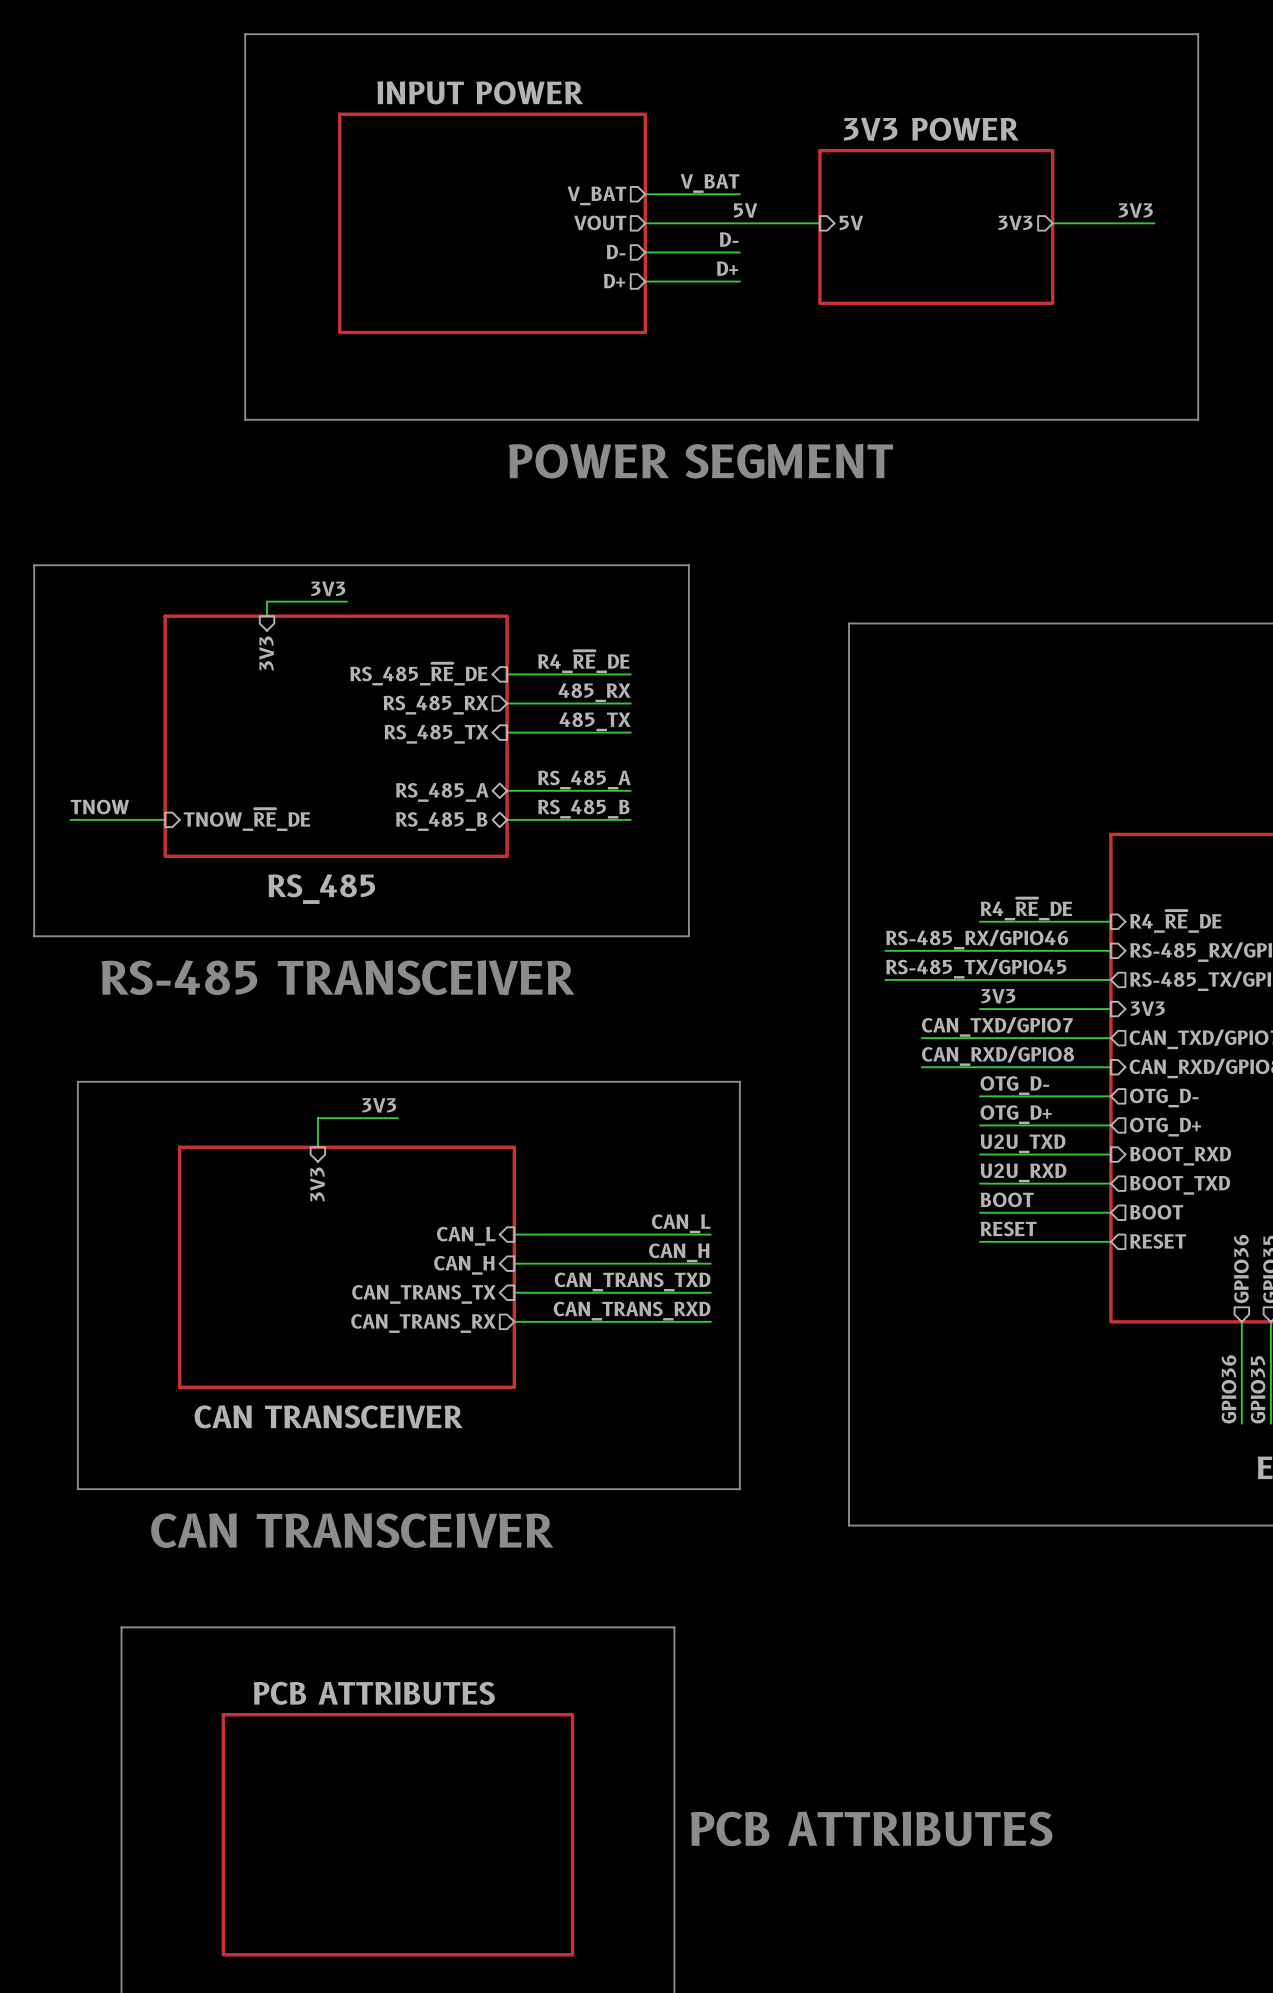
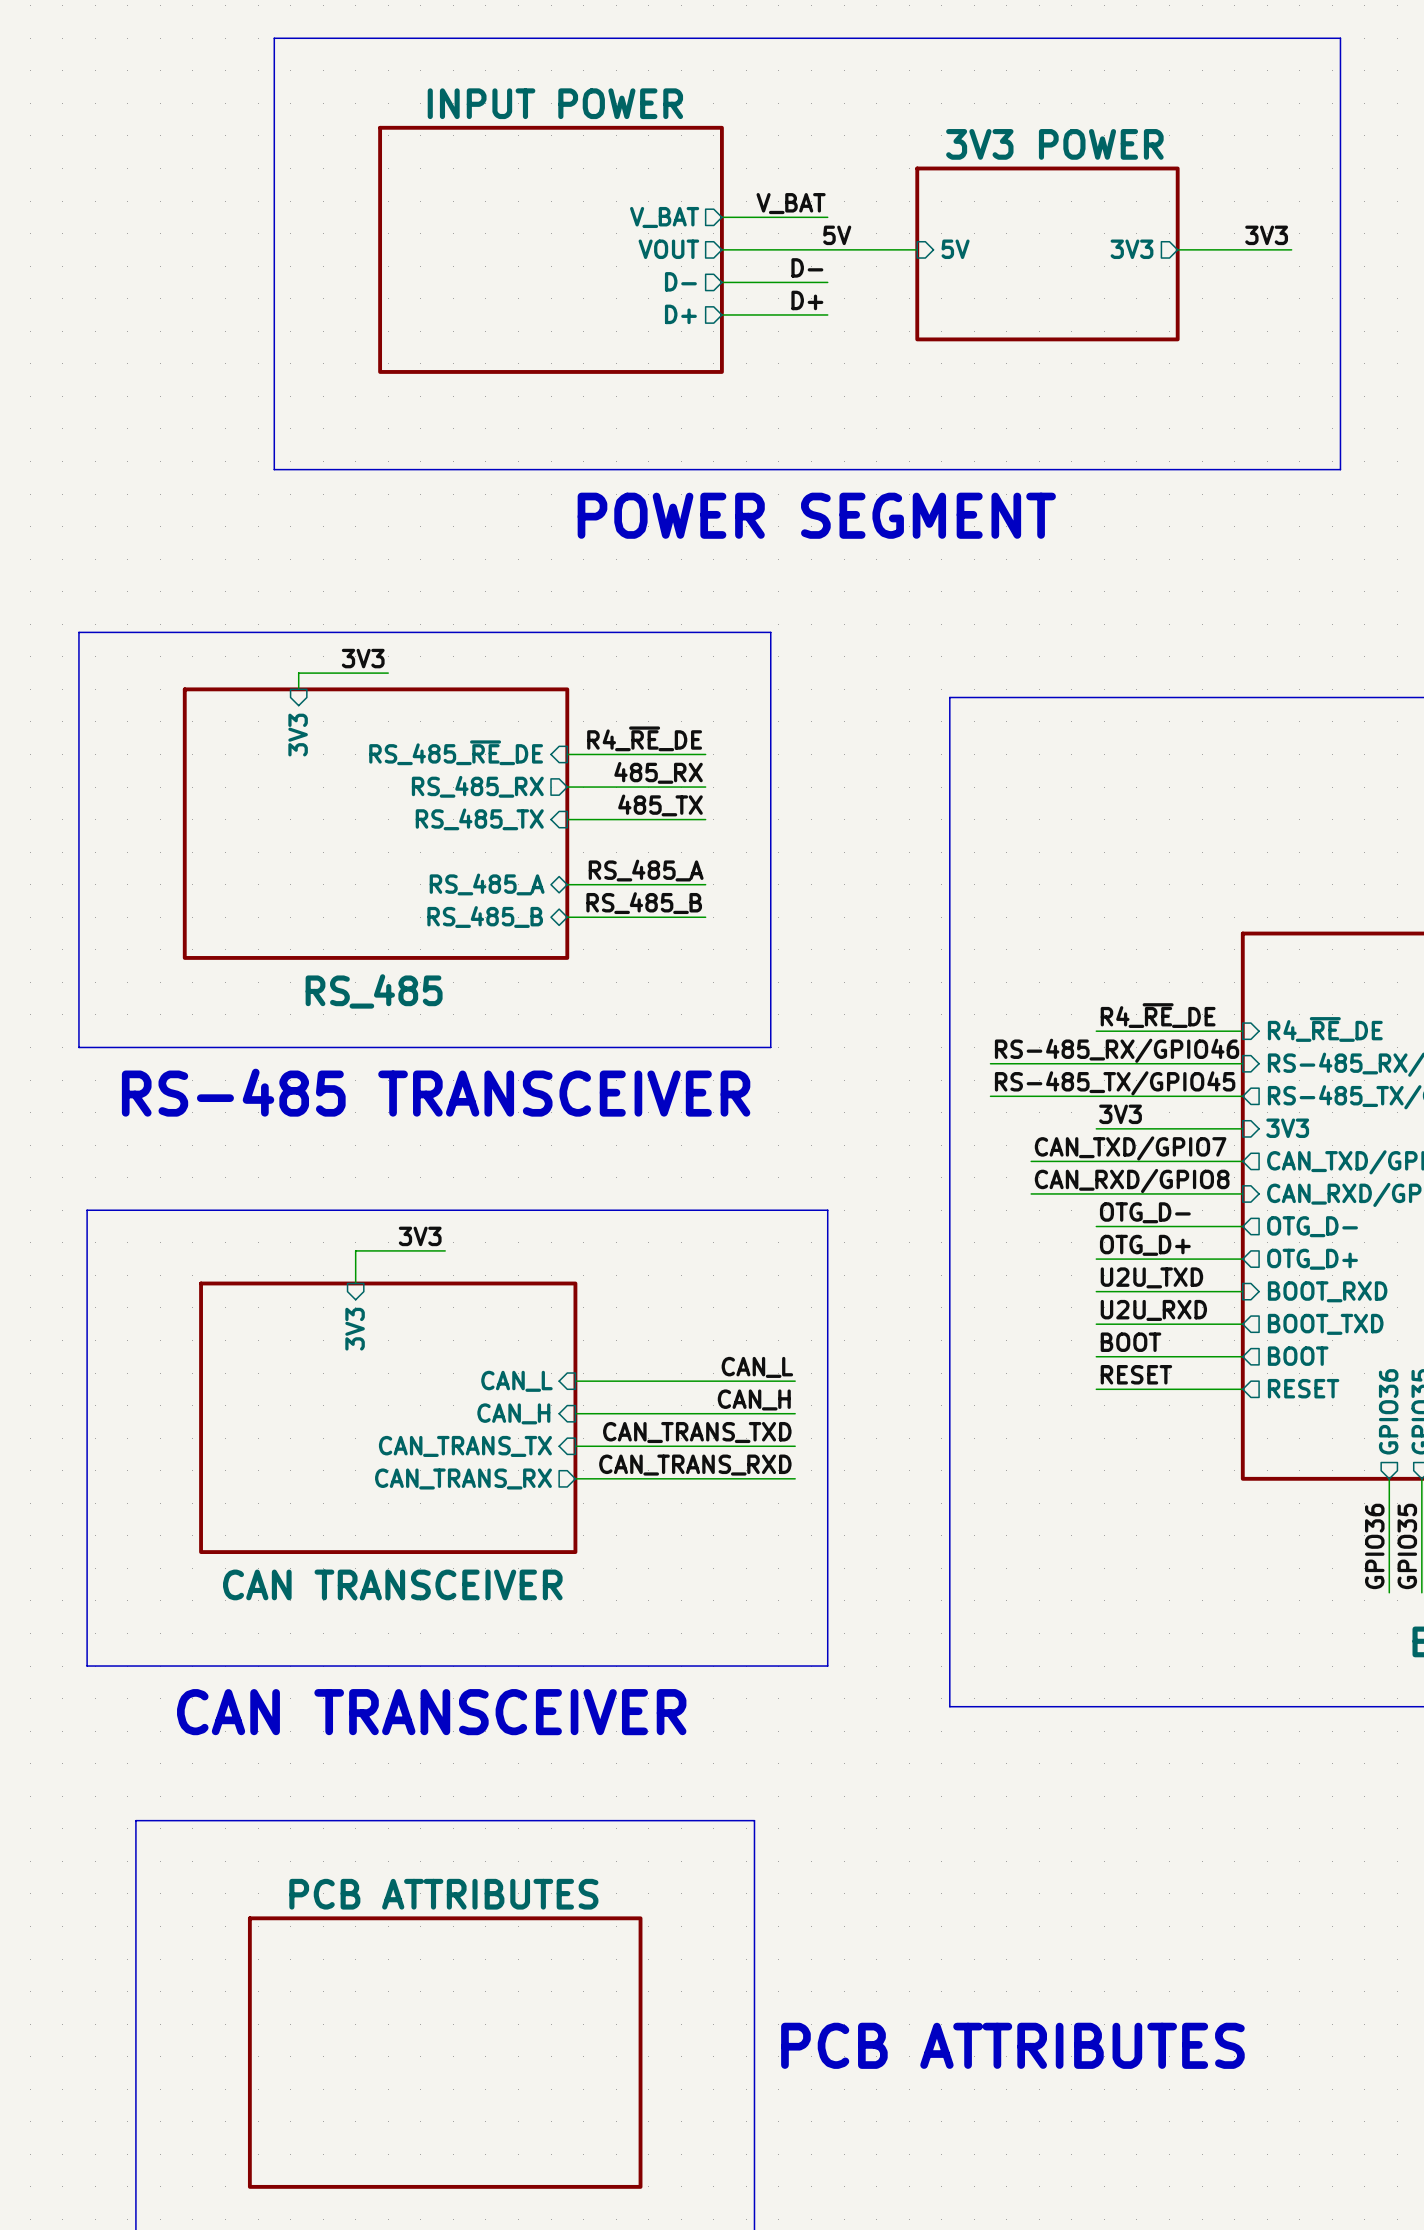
bus: (70, 565) (34, 565) (34, 936) (70, 936) -> (78, 632) (78, 1047)
label: TNOW (99, 806) -> none
wire: (70, 819) (165, 819) -> none
sheet pin: TNOW_~{RE}_DE (247, 819) -> none

